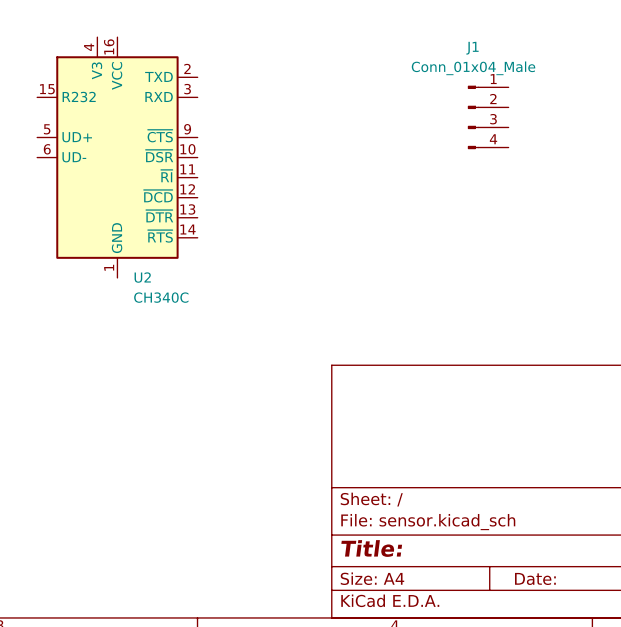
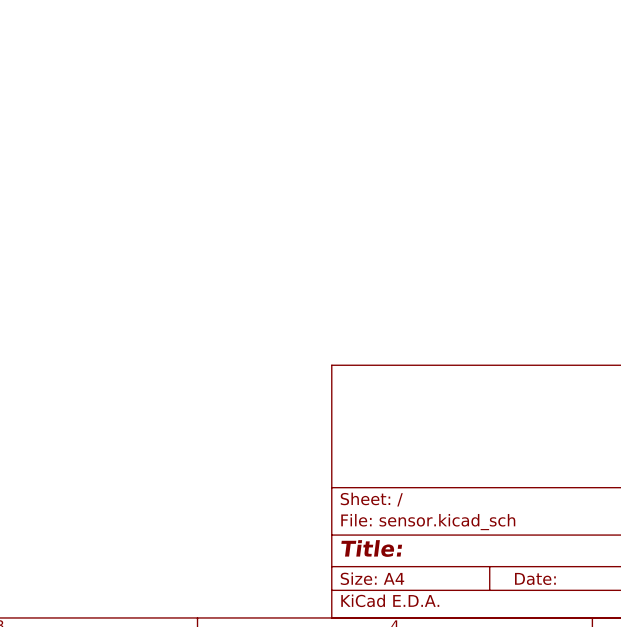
J1: Conn_01x04_Male (488, 117) -> none
U2: CH340C (117, 157) -> none

